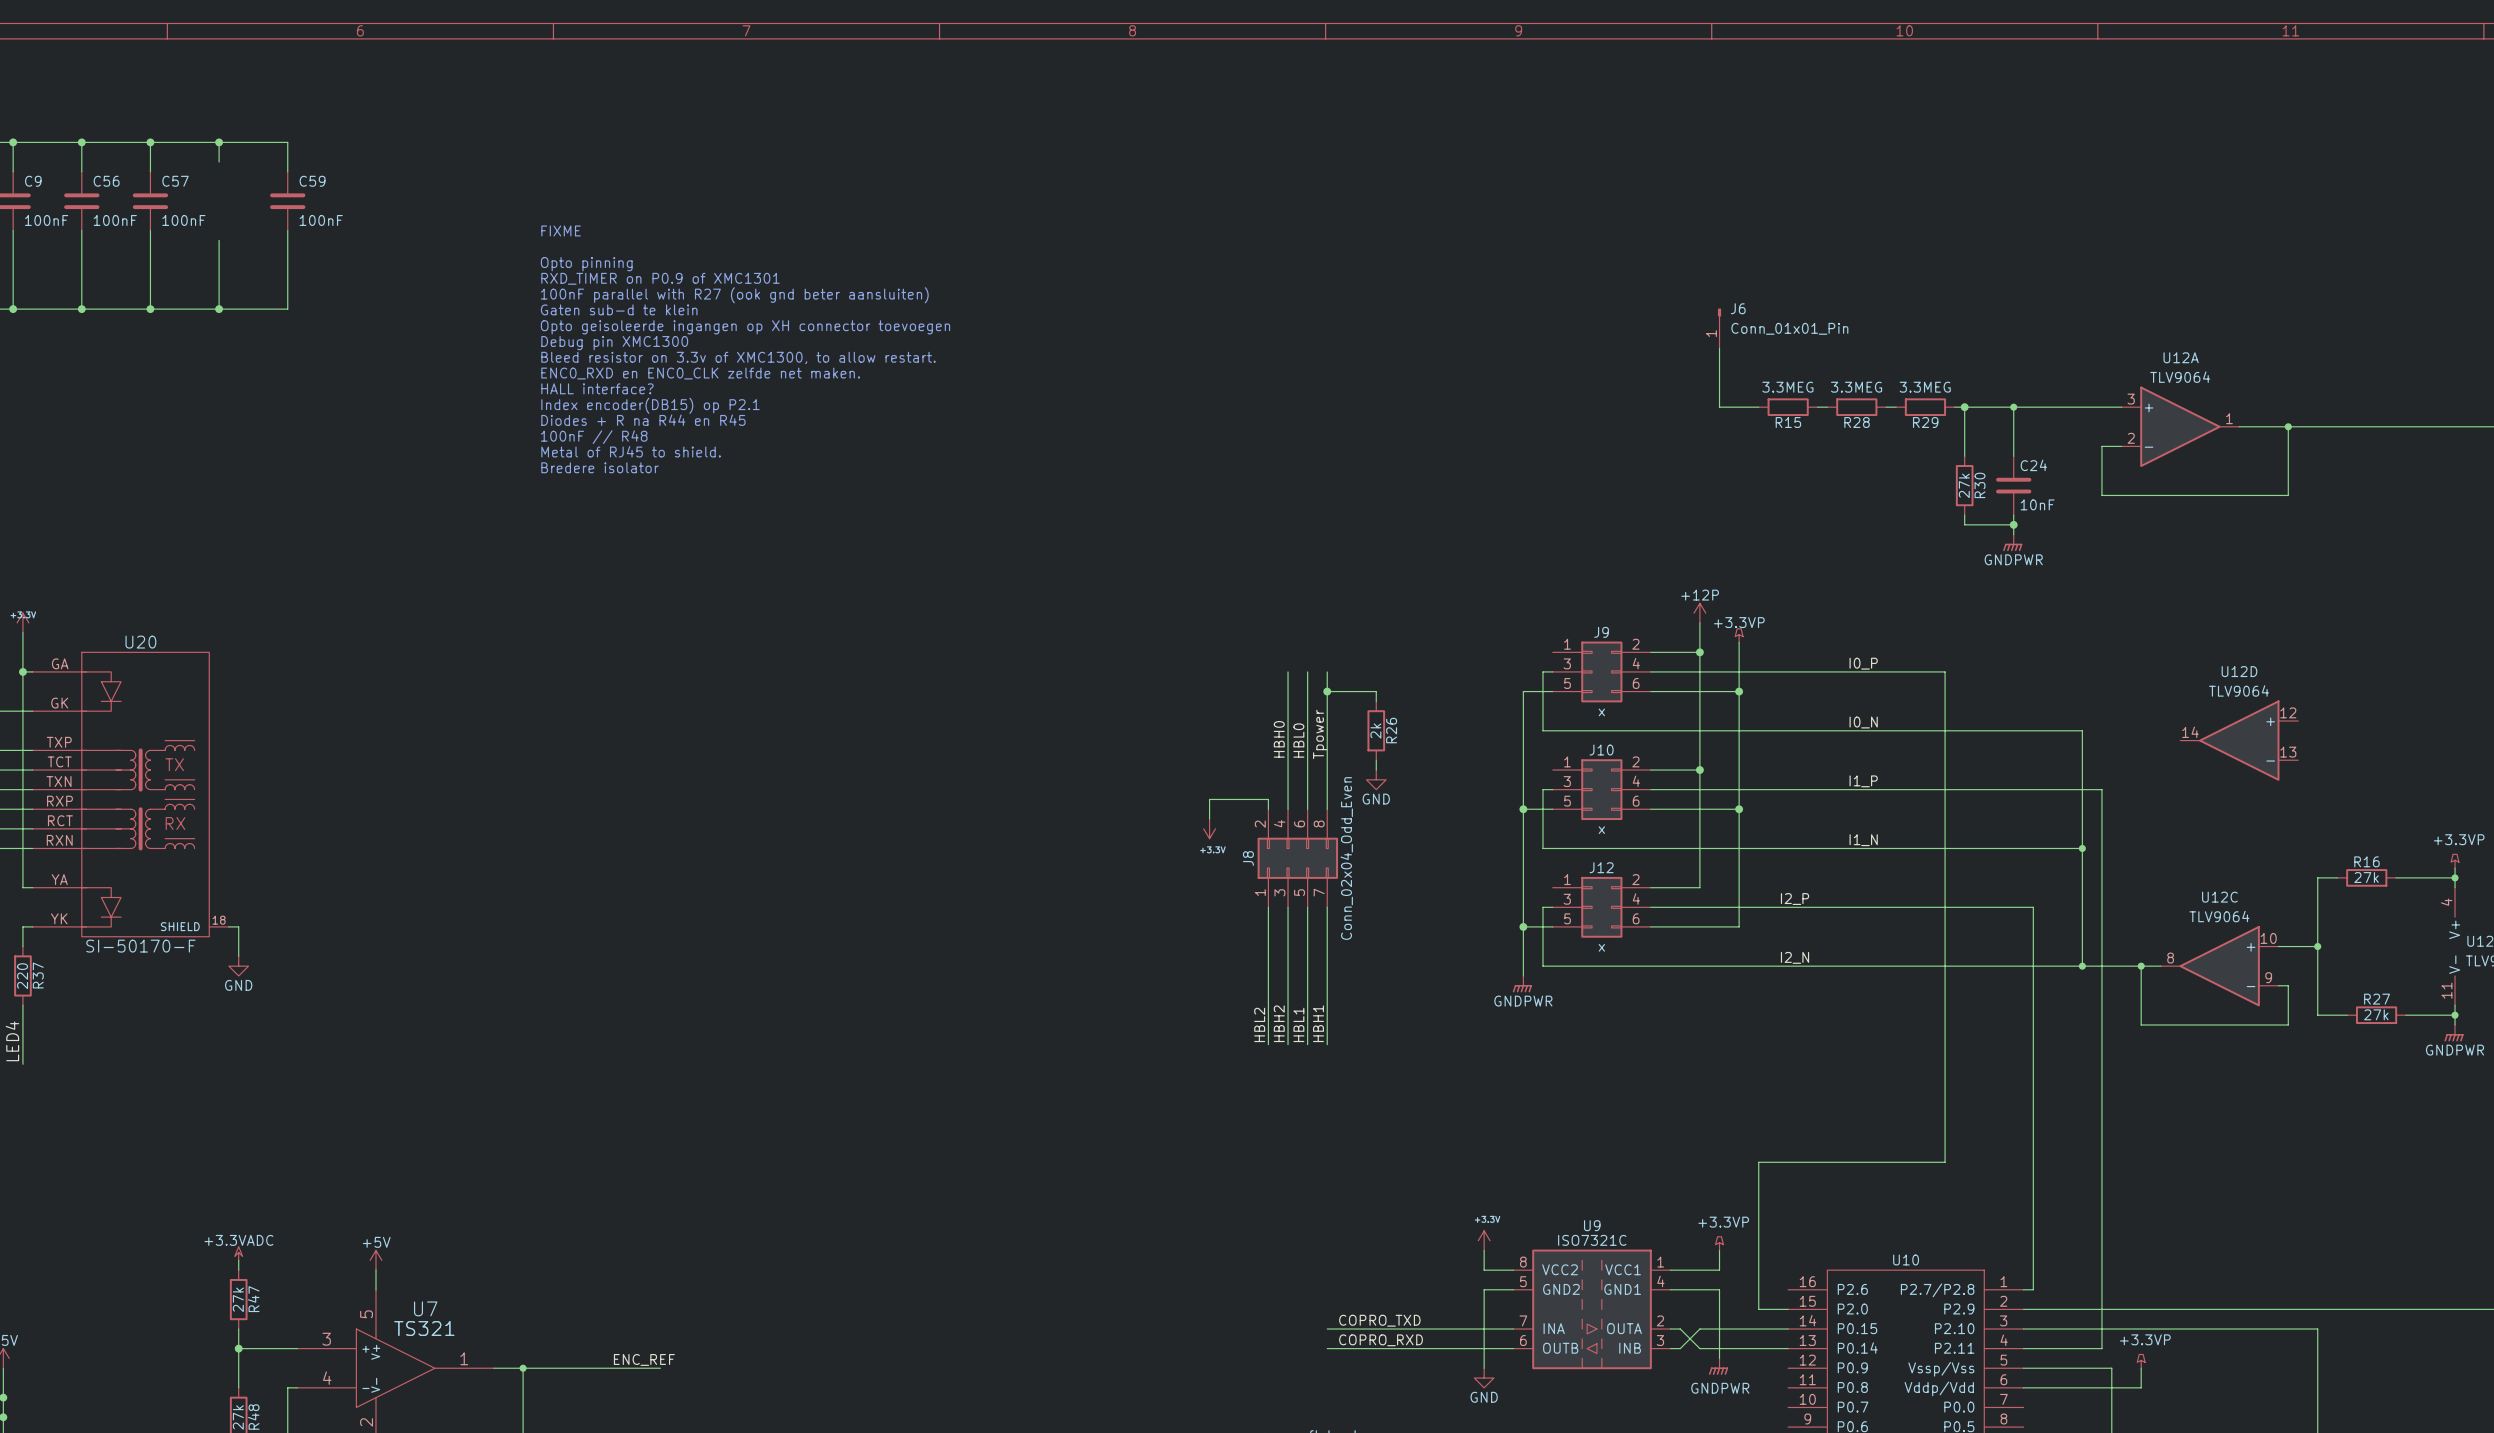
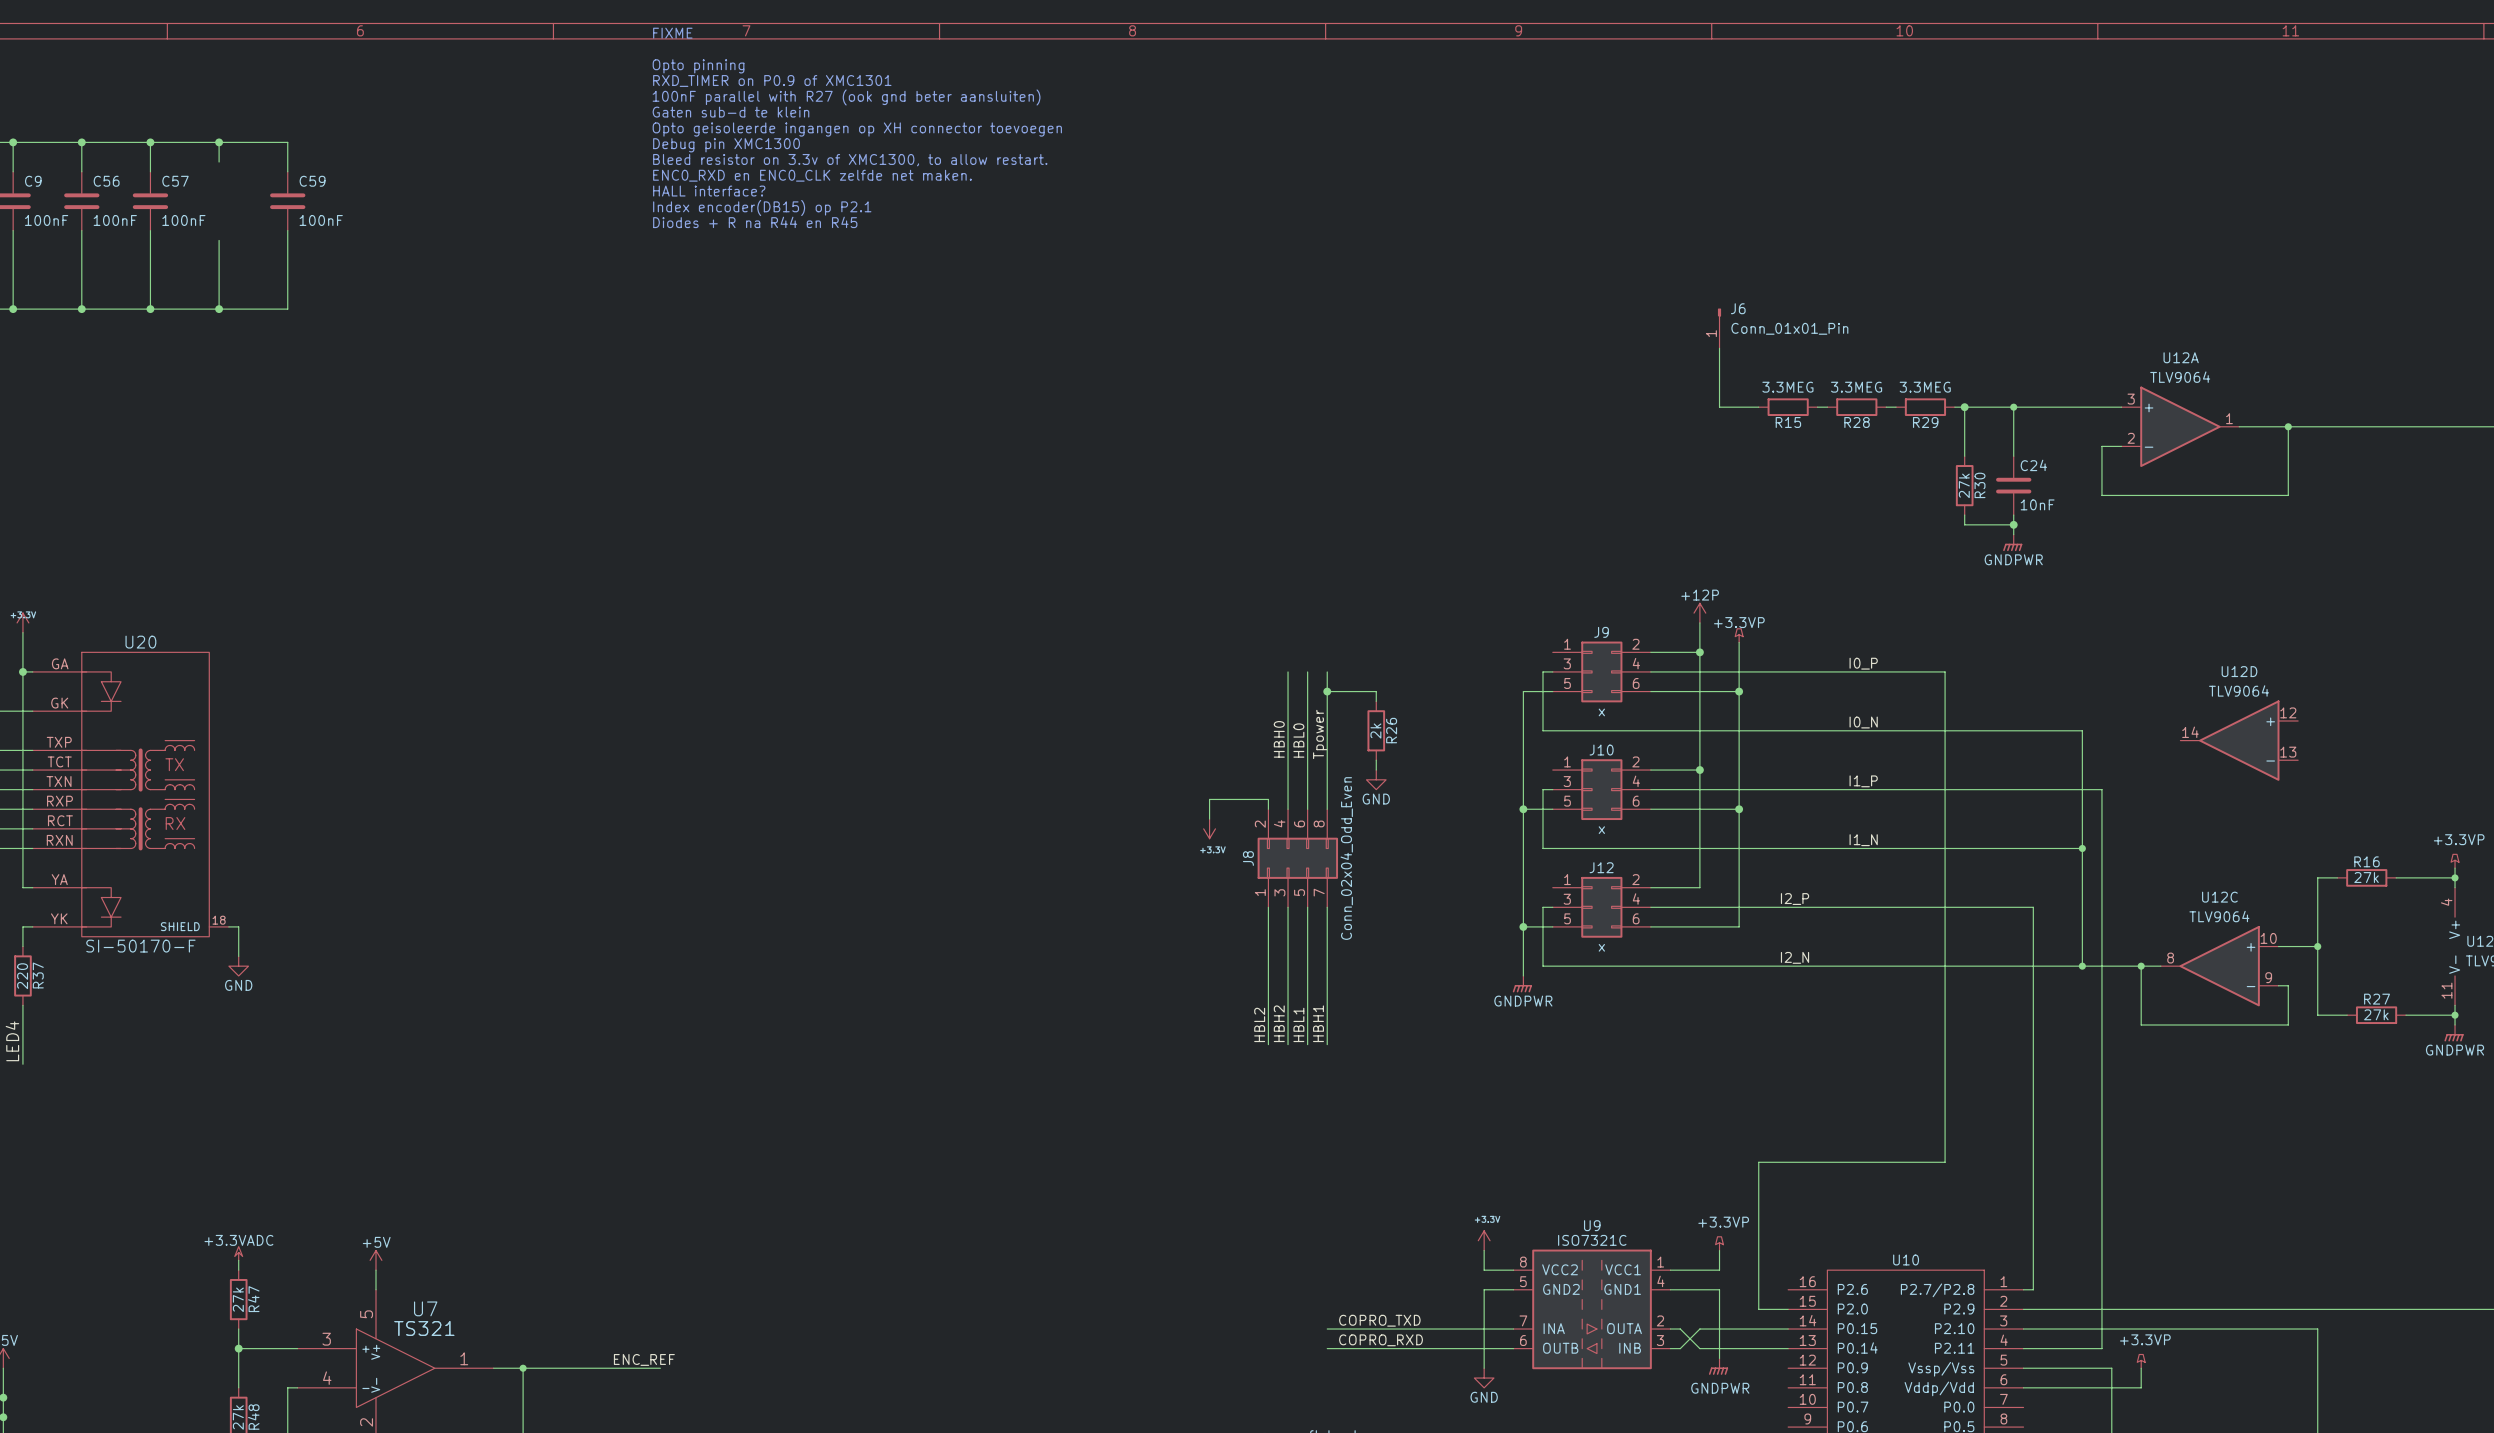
text: none -> FIXME (672, 33)
text: none -> Opto pinning (698, 66)
text: none -> RXD_TIMER on P0.9 of XMC1301 (772, 80)
text: none -> 100nF parallel with R27 (ook gnd beter aansluiten) (846, 97)
text: none -> Gaten sub-d te klein (730, 112)
text: none -> Opto geisoleerde ingangen op XH connector toevoegen (857, 129)
text: none -> Debug pin XMC1300 (726, 145)
text: none -> Bleed resistor on 3.3v of XMC1300, to allow restart. (850, 160)
text: none -> ENC0_RXD en ENC0_CLK zelfde net maken. (812, 175)
text: none -> HALL interface? (709, 191)
text: none -> Index encoder(DB15) op P2.1 (762, 208)
text: none -> Diodes + R na R44 en R45 (755, 222)
text: FIXME (561, 230) -> none
text: Opto pinning (586, 264) -> none
text: RXD_TIMER on P0.9 of XMC1301 (660, 278) -> none
text: 100nF parallel with R27 (ook gnd beter aansluiten) (734, 295) -> none
text: Gaten sub-d te klein (619, 309) -> none
text: Opto geisoleerde ingangen op XH connector toevoegen (745, 327) -> none
text: Debug pin XMC1300 (614, 343) -> none
text: Bleed resistor on 3.3v of XMC1300, to allow restart. (738, 357) -> none
text: ENC0_RXD en ENC0_CLK zelfde net maken. (700, 373) -> none
text: HALL interface? (597, 388) -> none
text: Index encoder(DB15) op P2.1 (650, 405) -> none
text: Diodes + R na R44 en R45 (643, 420) -> none
text: 100nF // R48 (594, 437) -> none
text: Metal of RJ45 to shield. (631, 451) -> none
text: Bredere isolator (600, 467) -> none

